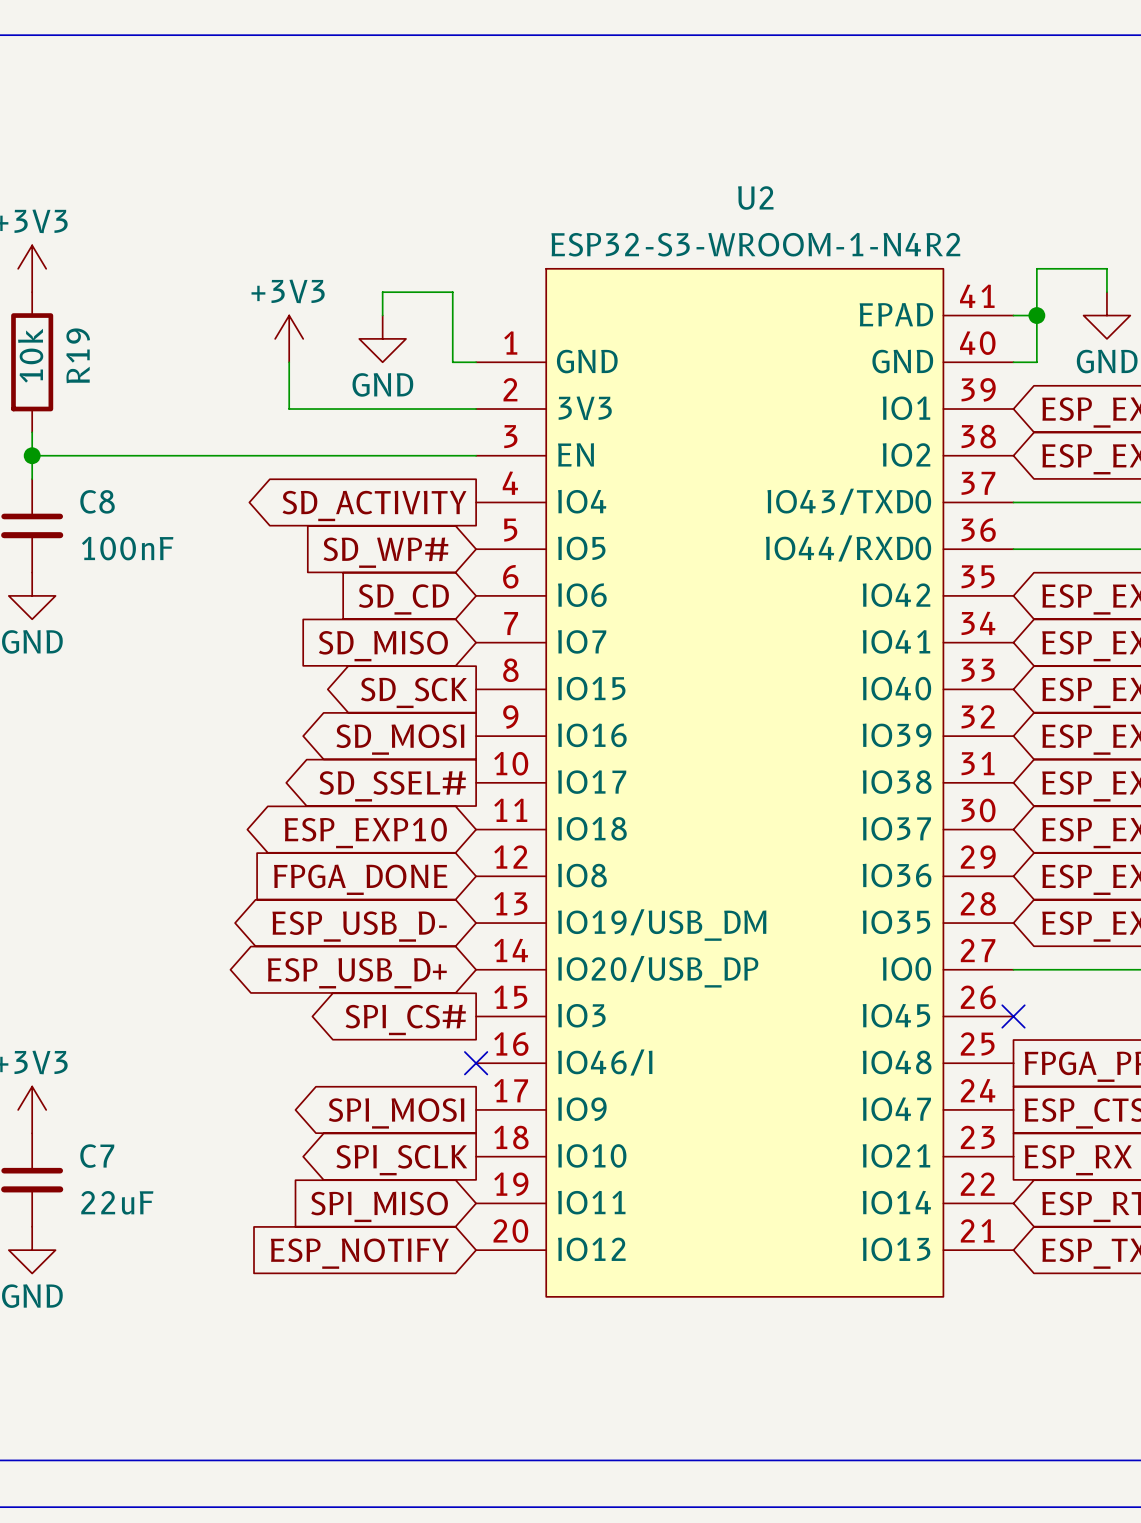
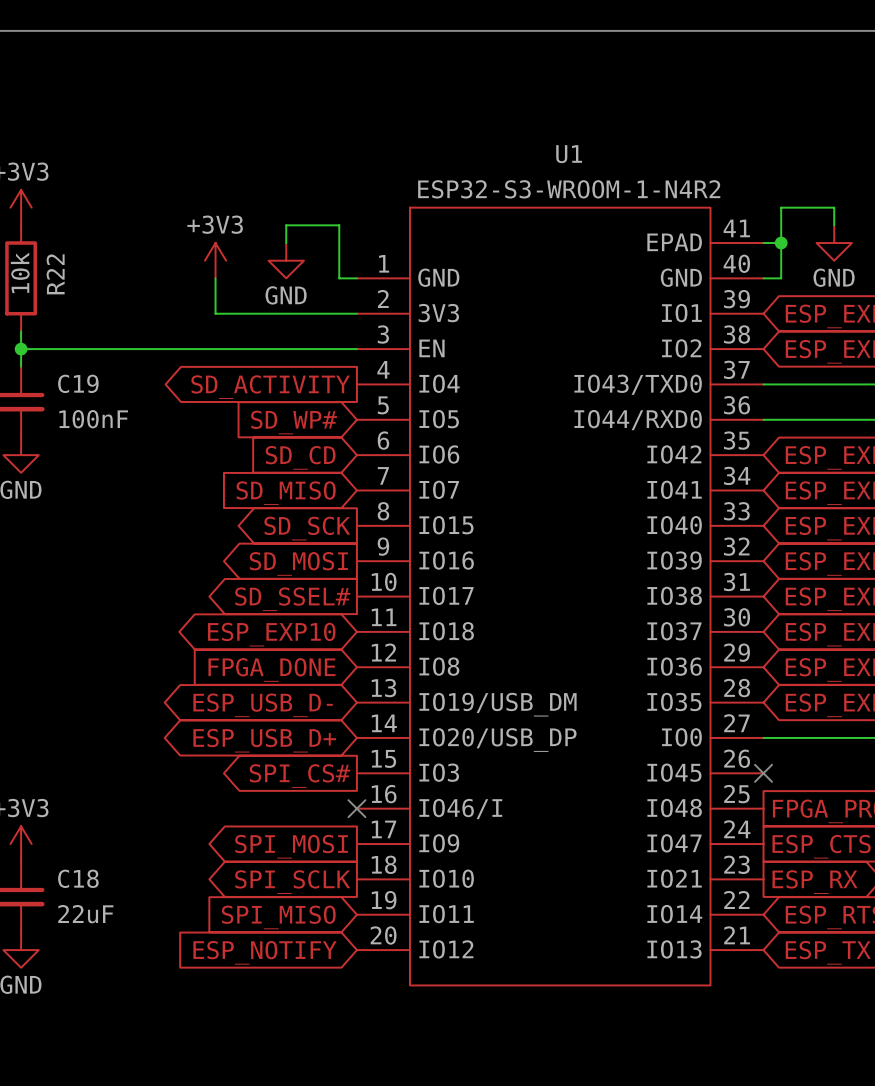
U2 name: U2 (755, 197) -> U1 (569, 154)
R19 name: R19 (78, 355) -> R22 (55, 274)
C8 name: C8 (97, 501) -> C19 (78, 383)
C7 name: C7 (97, 1156) -> C18 (78, 878)

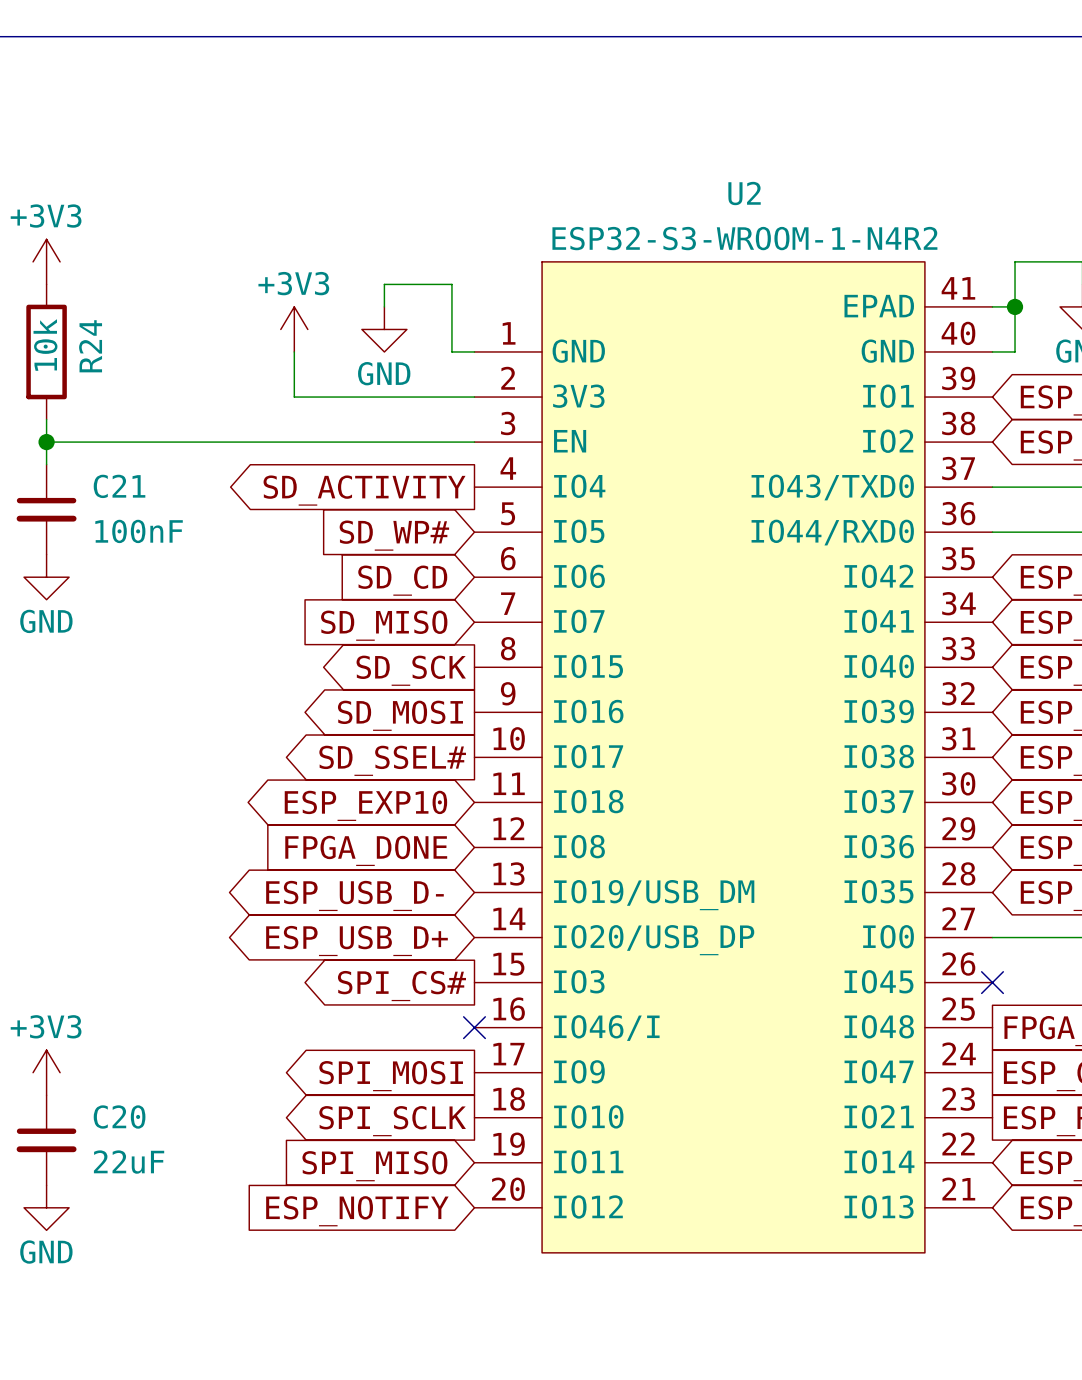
U1 name: U1 (569, 154) -> U2 (744, 193)
R22 name: R22 (55, 274) -> R24 (90, 346)
C19 name: C19 (78, 383) -> C21 (119, 486)
C18 name: C18 (78, 878) -> C20 (119, 1117)

